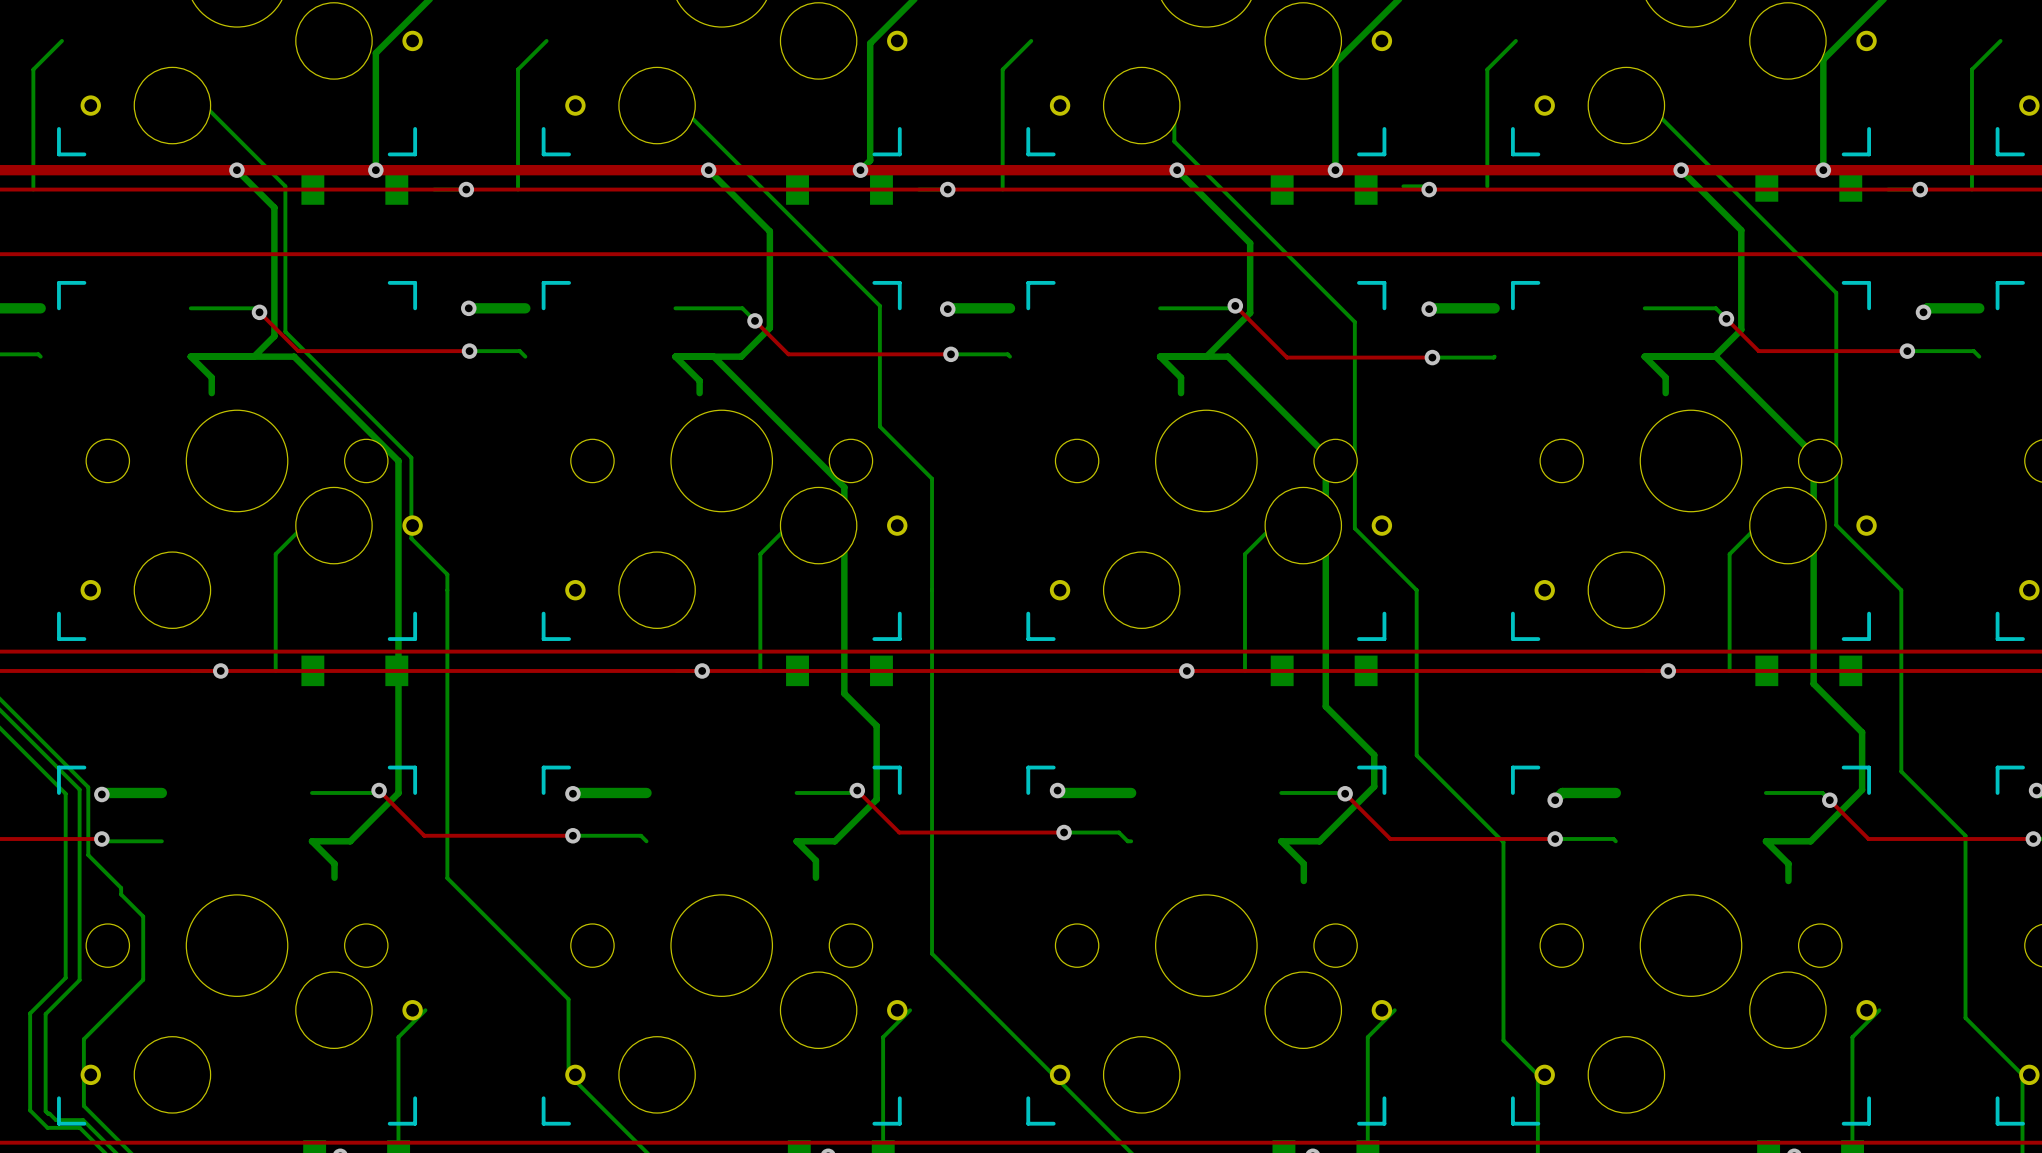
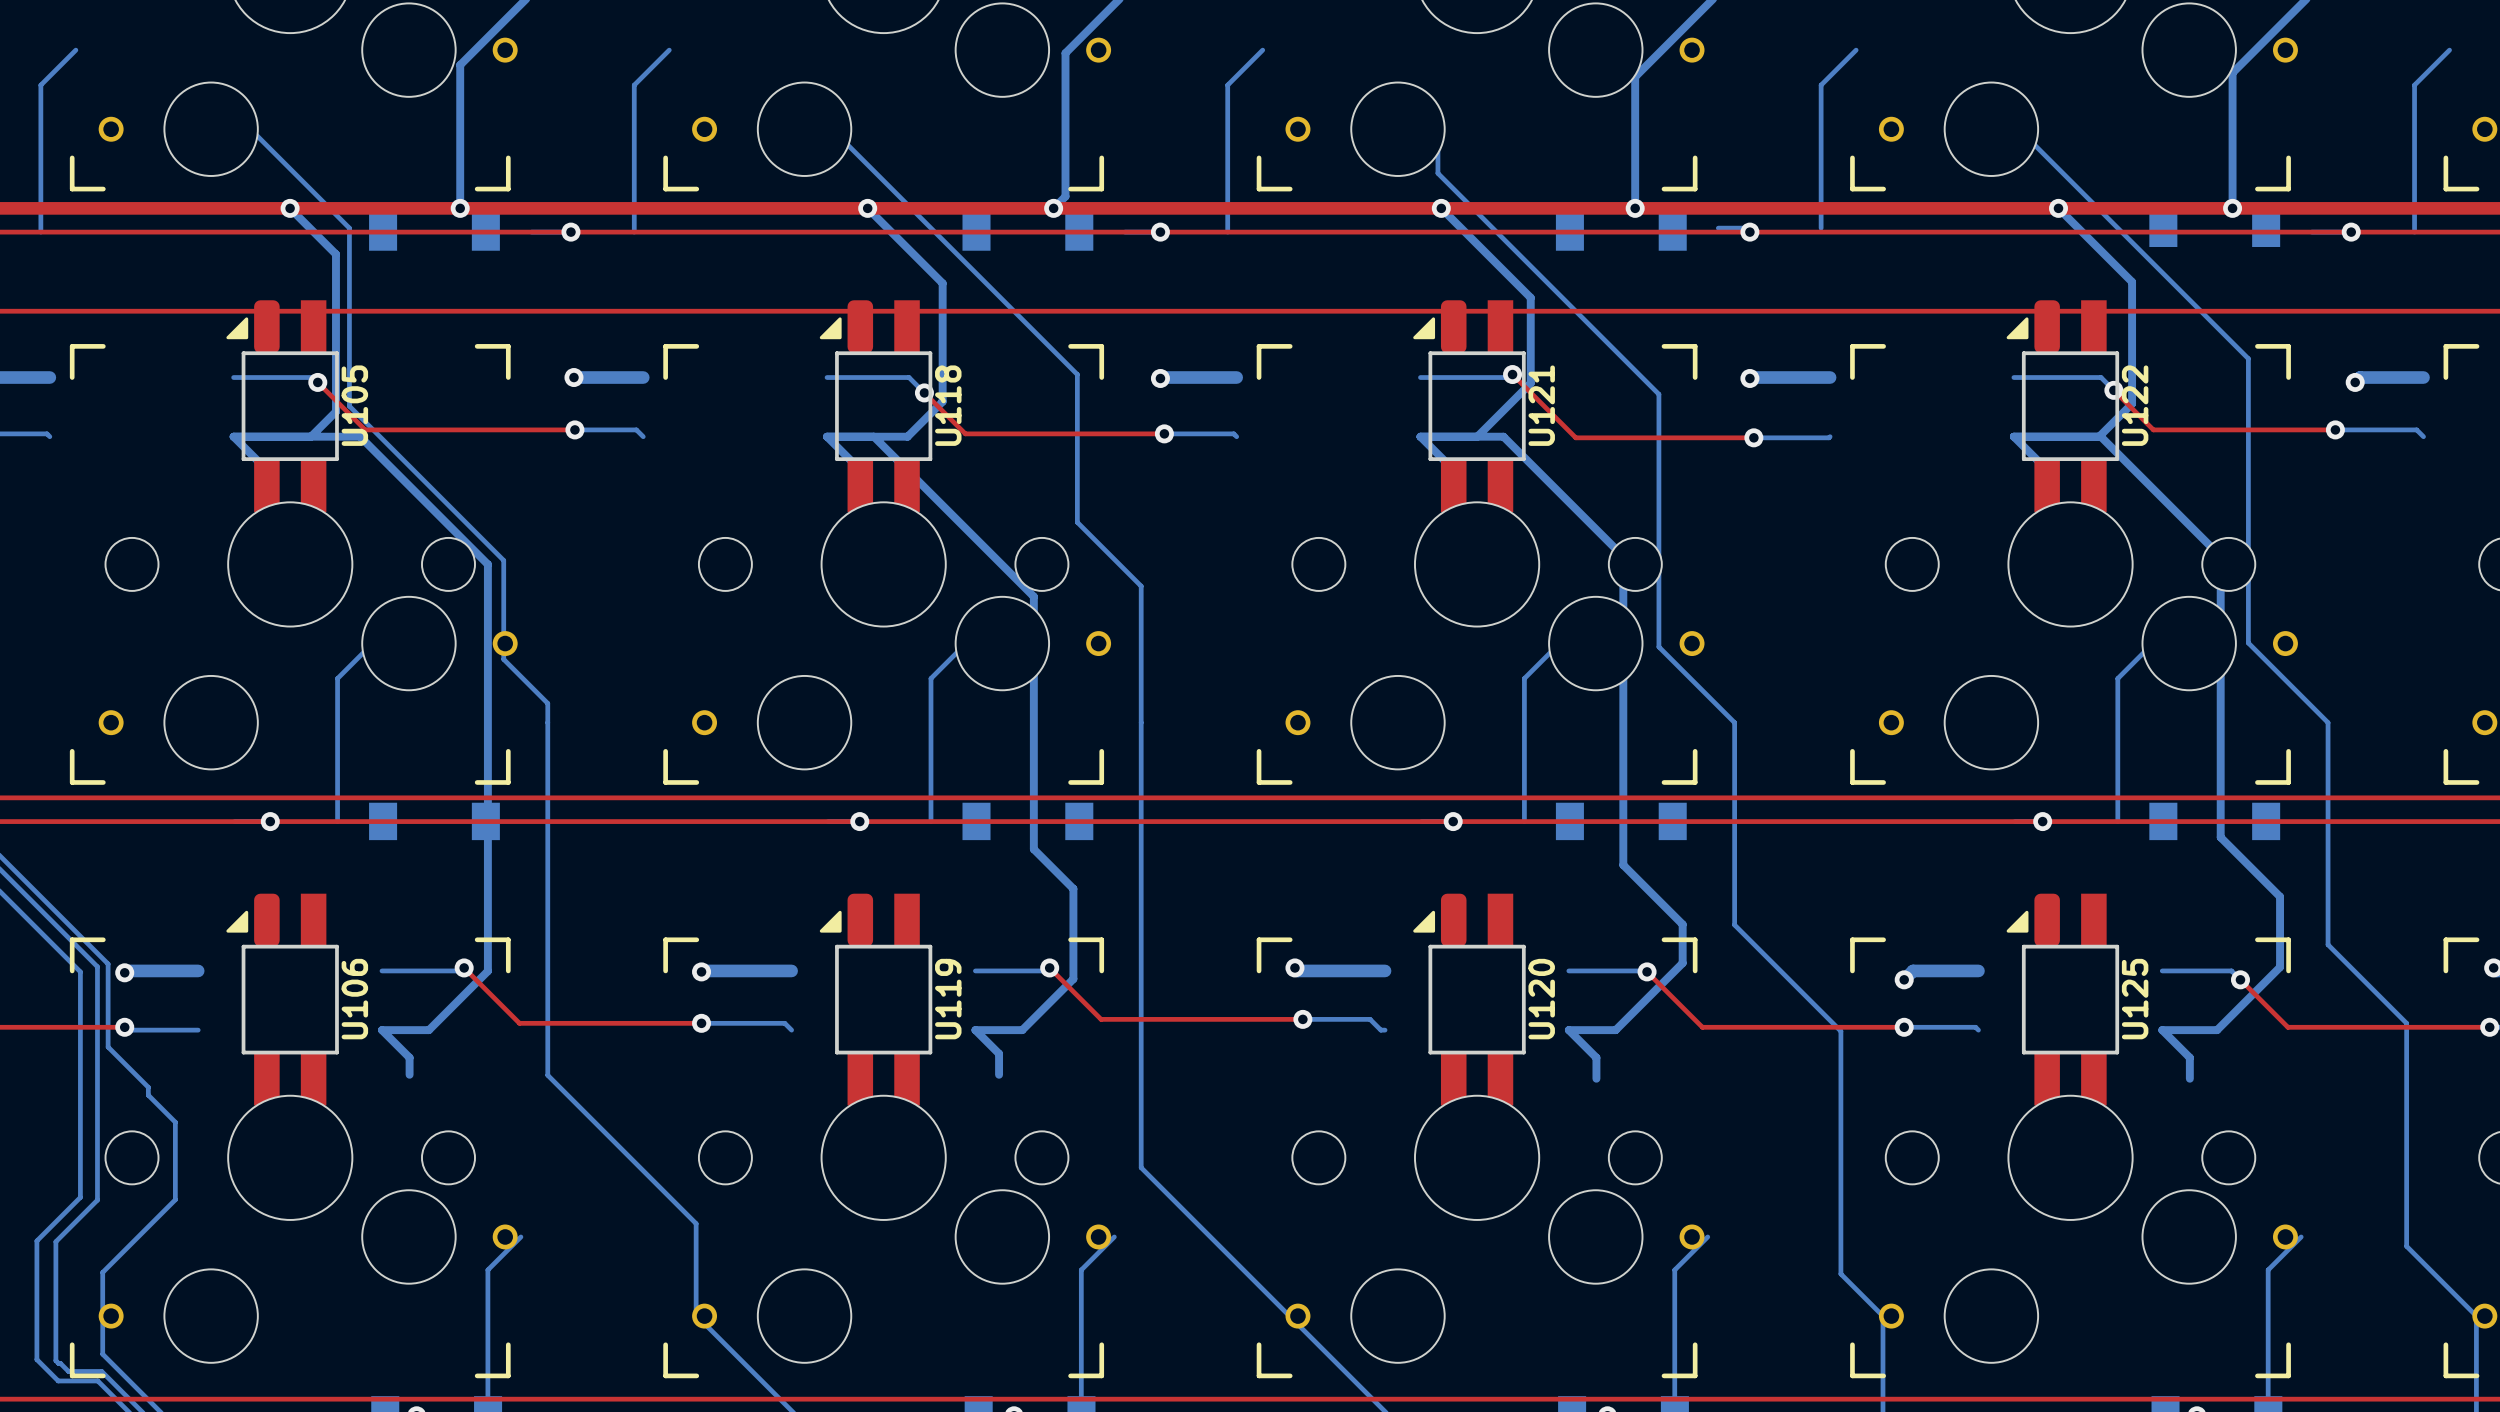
U105: none -> (282, 406)
U118: none -> (876, 406)
U121: none -> (1469, 406)
U122: none -> (2062, 406)
U106: none -> (282, 999)
U119: none -> (876, 999)
U120: none -> (1469, 999)
U125: none -> (2062, 999)

